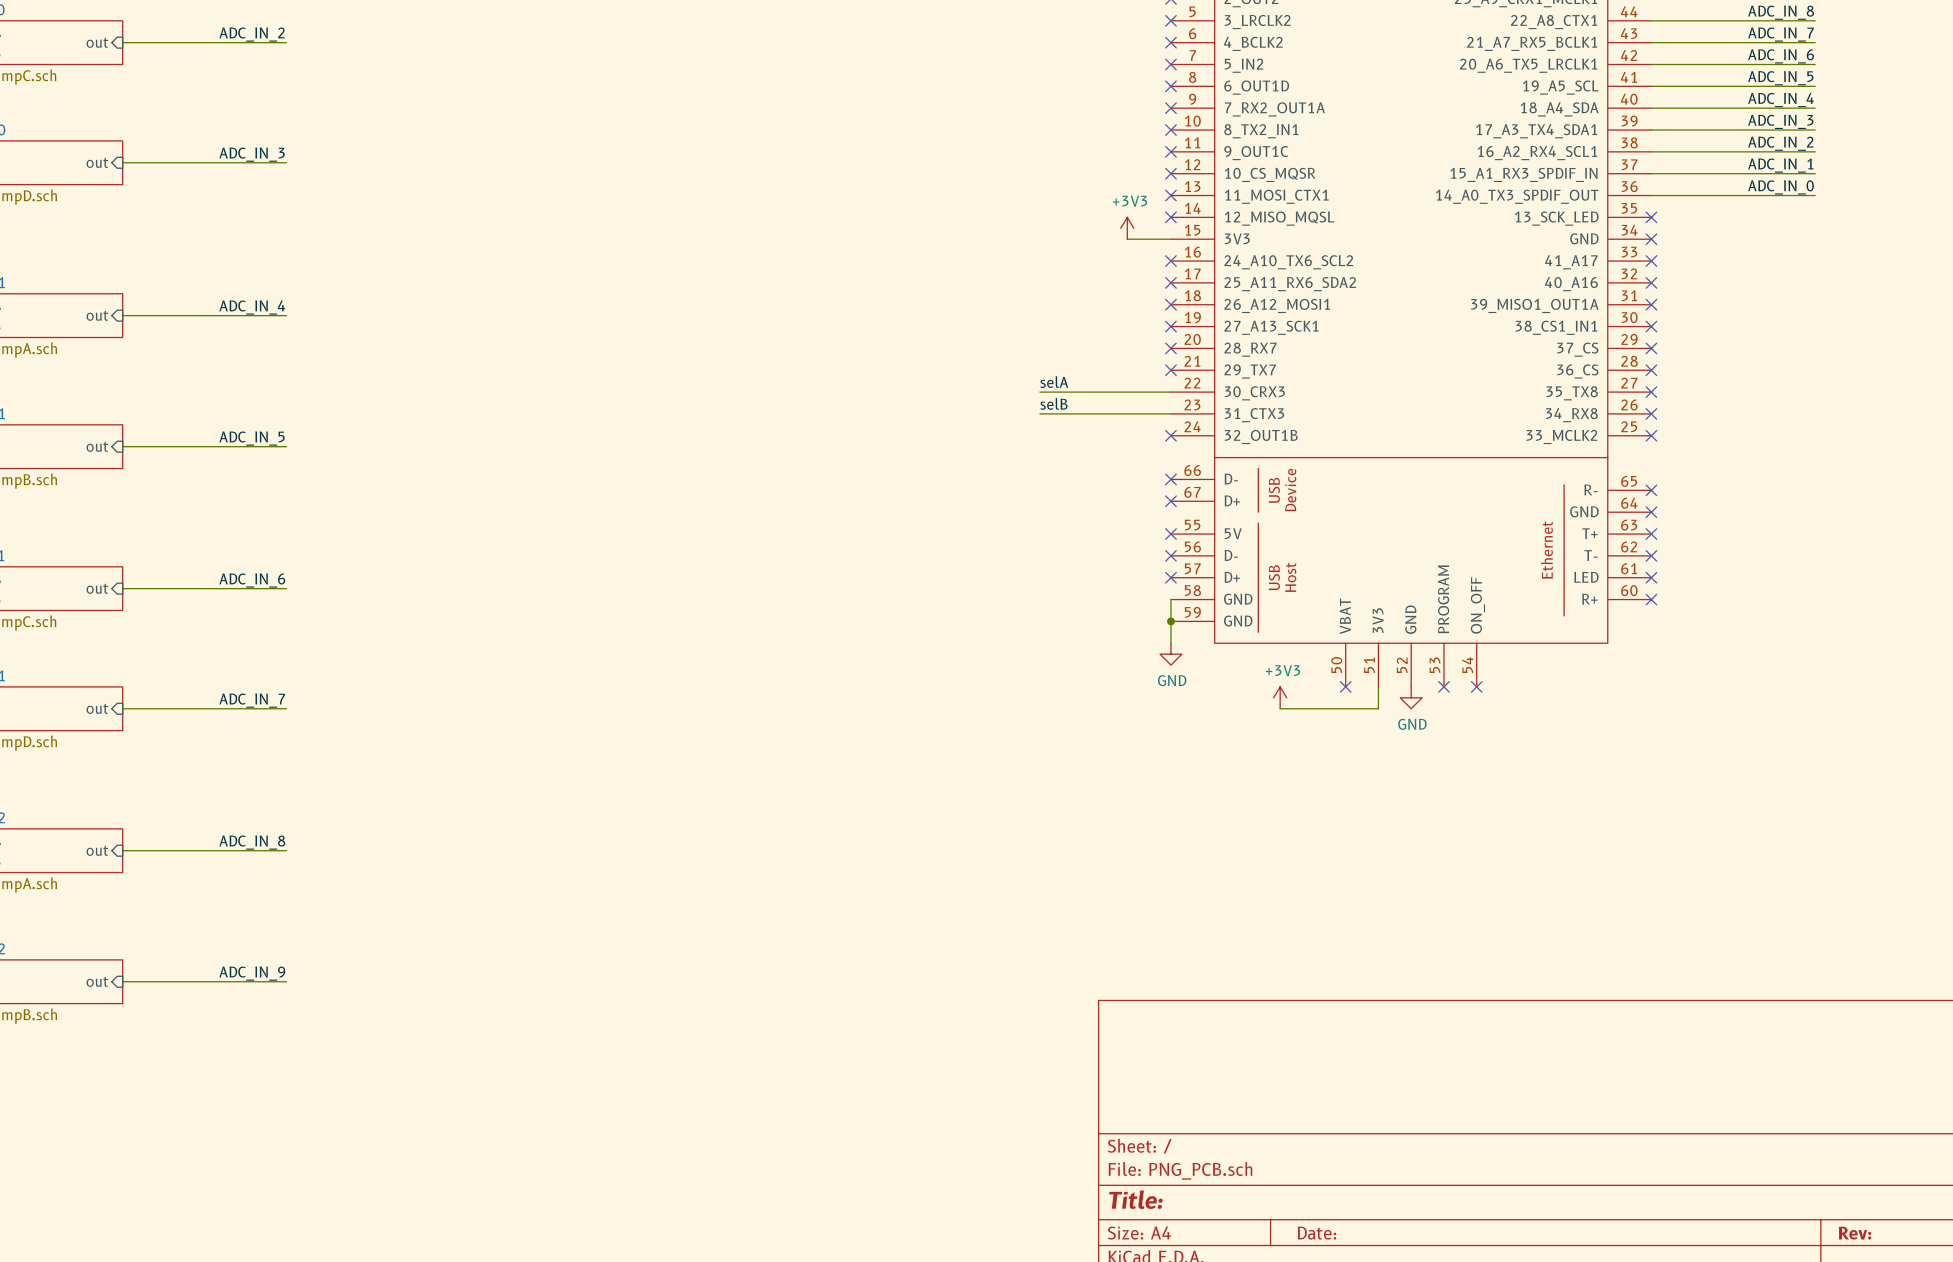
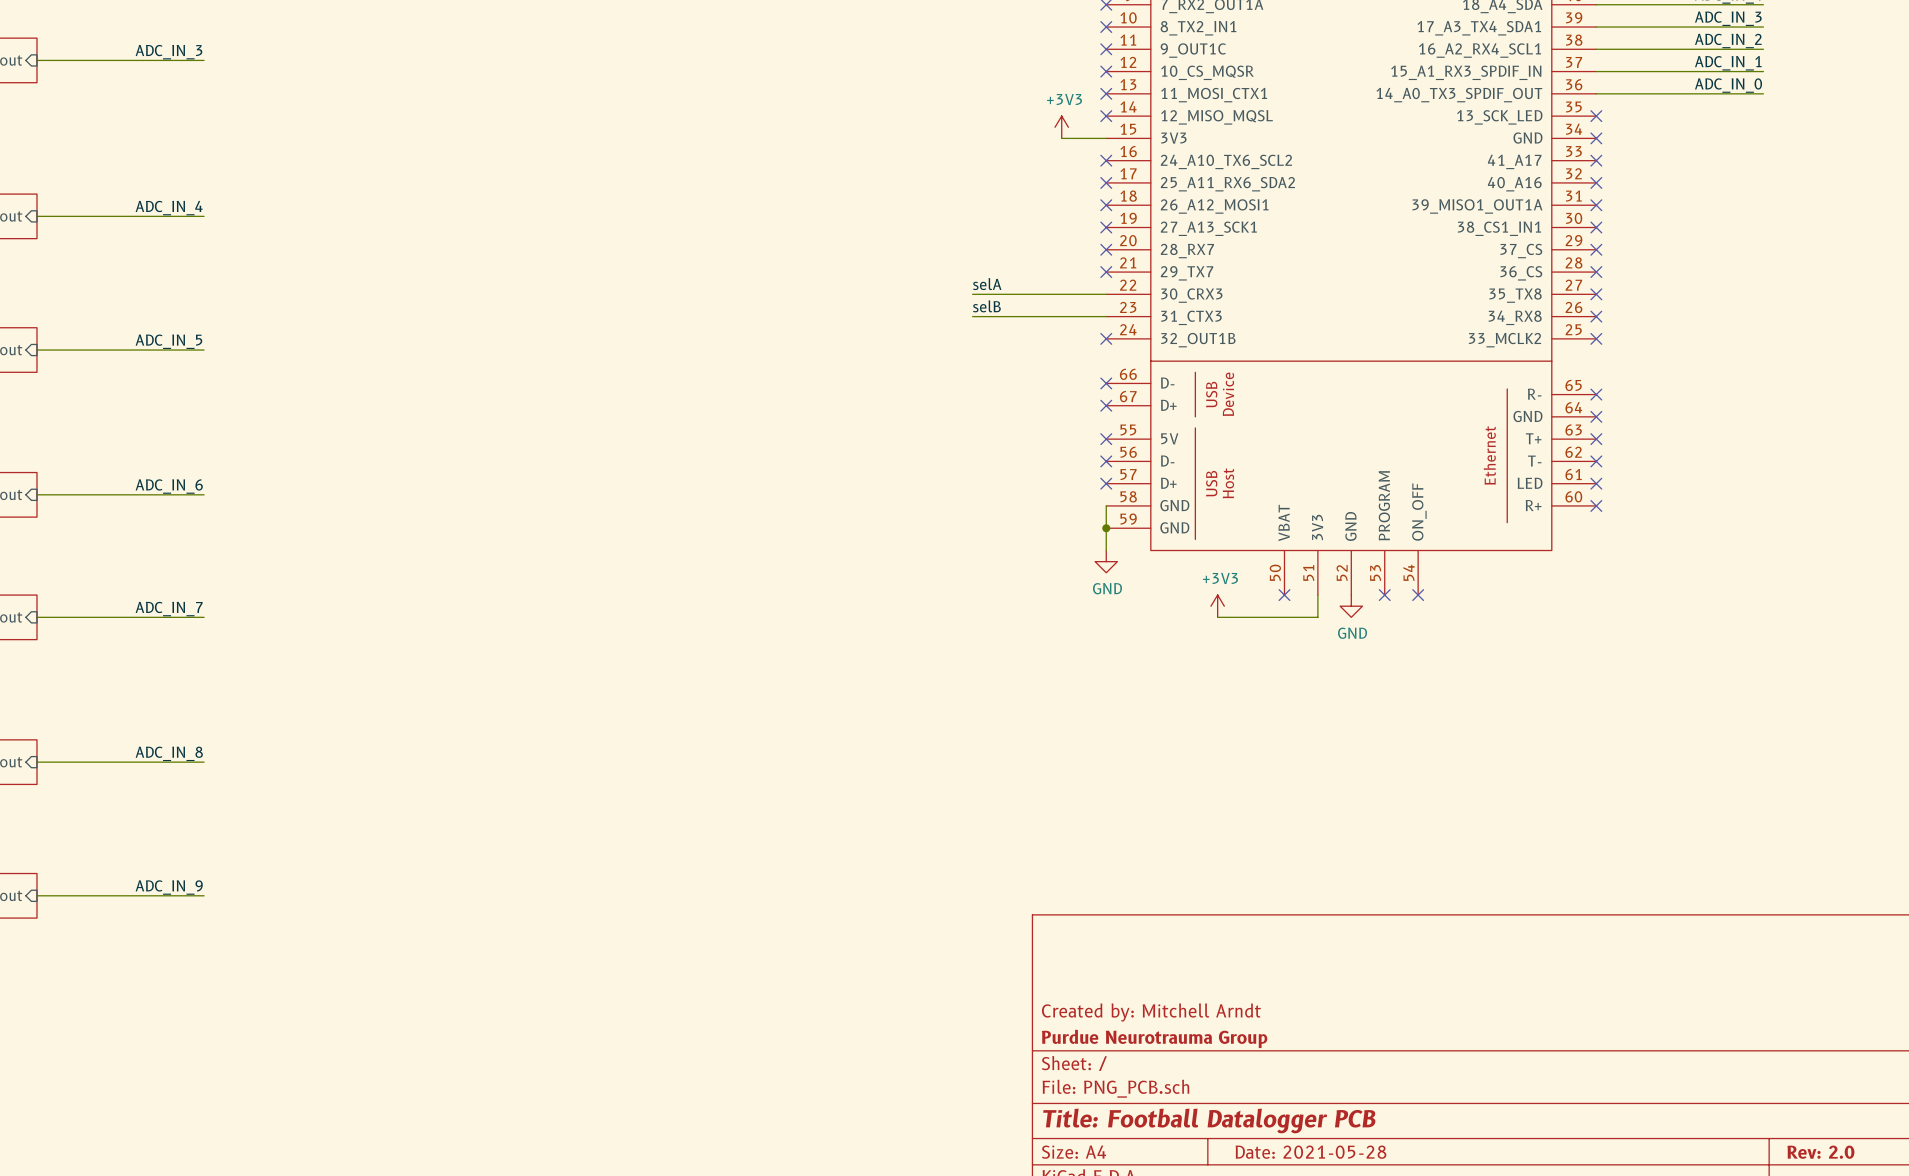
title block: none -> Created by: Mitchell Arndt (1151, 1012)
title block: none -> Purdue Neurotrauma Group (1154, 1038)
title block: Title: (1135, 1199) -> Title: Football Datalogger PCB (1209, 1120)
title block: Date: (1317, 1233) -> Date: 2021-05-28 (1310, 1152)
title block: Rev: (1855, 1233) -> Rev: 2.0 (1820, 1152)

